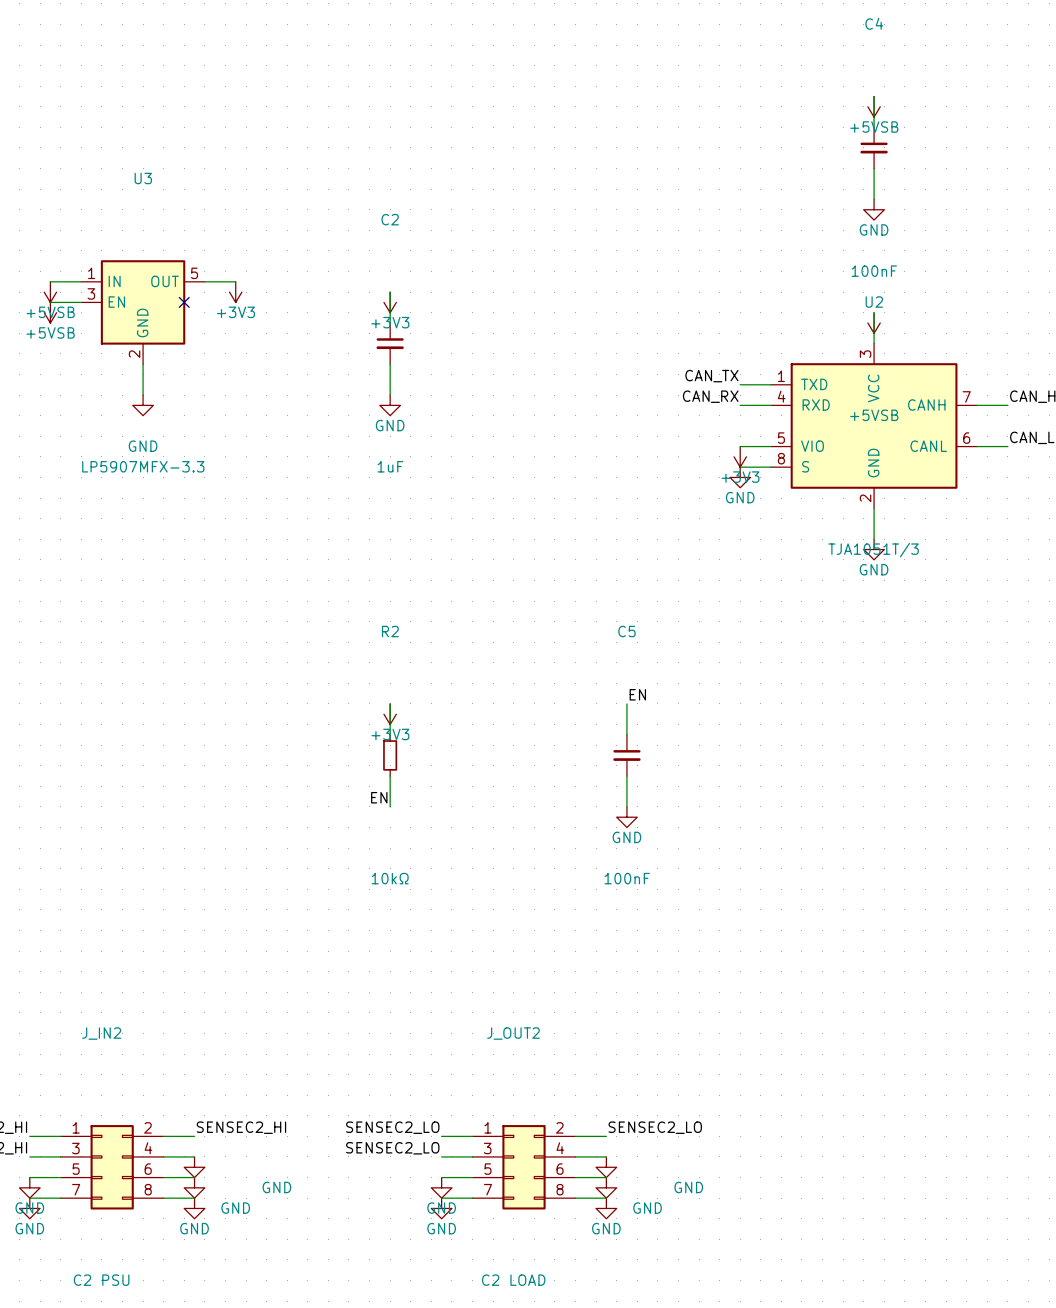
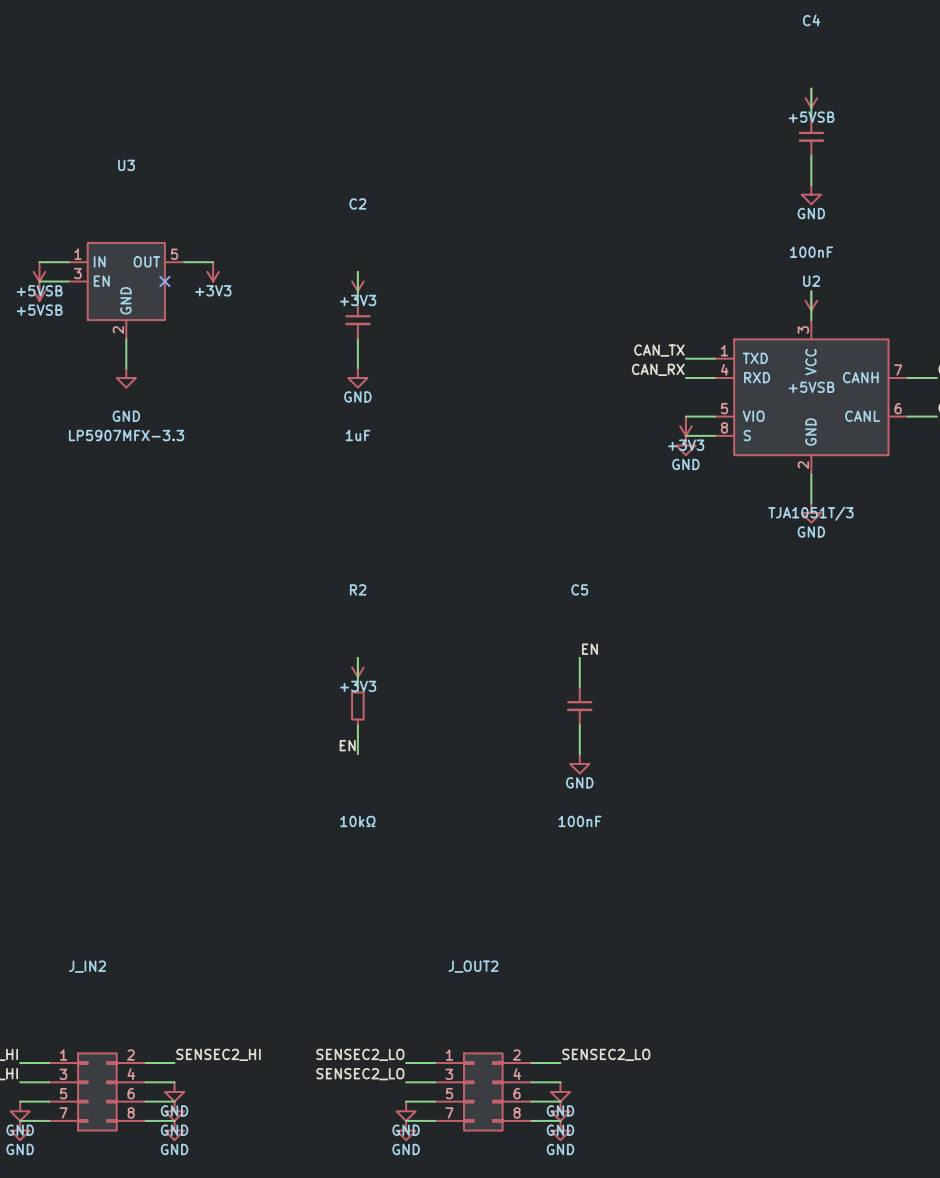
power symbol text position: GND (276, 1187) -> GND (174, 1110)
power symbol text position: GND (688, 1187) -> GND (560, 1110)
power symbol text position: GND (235, 1208) -> GND (174, 1130)
power symbol text position: GND (647, 1208) -> GND (560, 1130)

